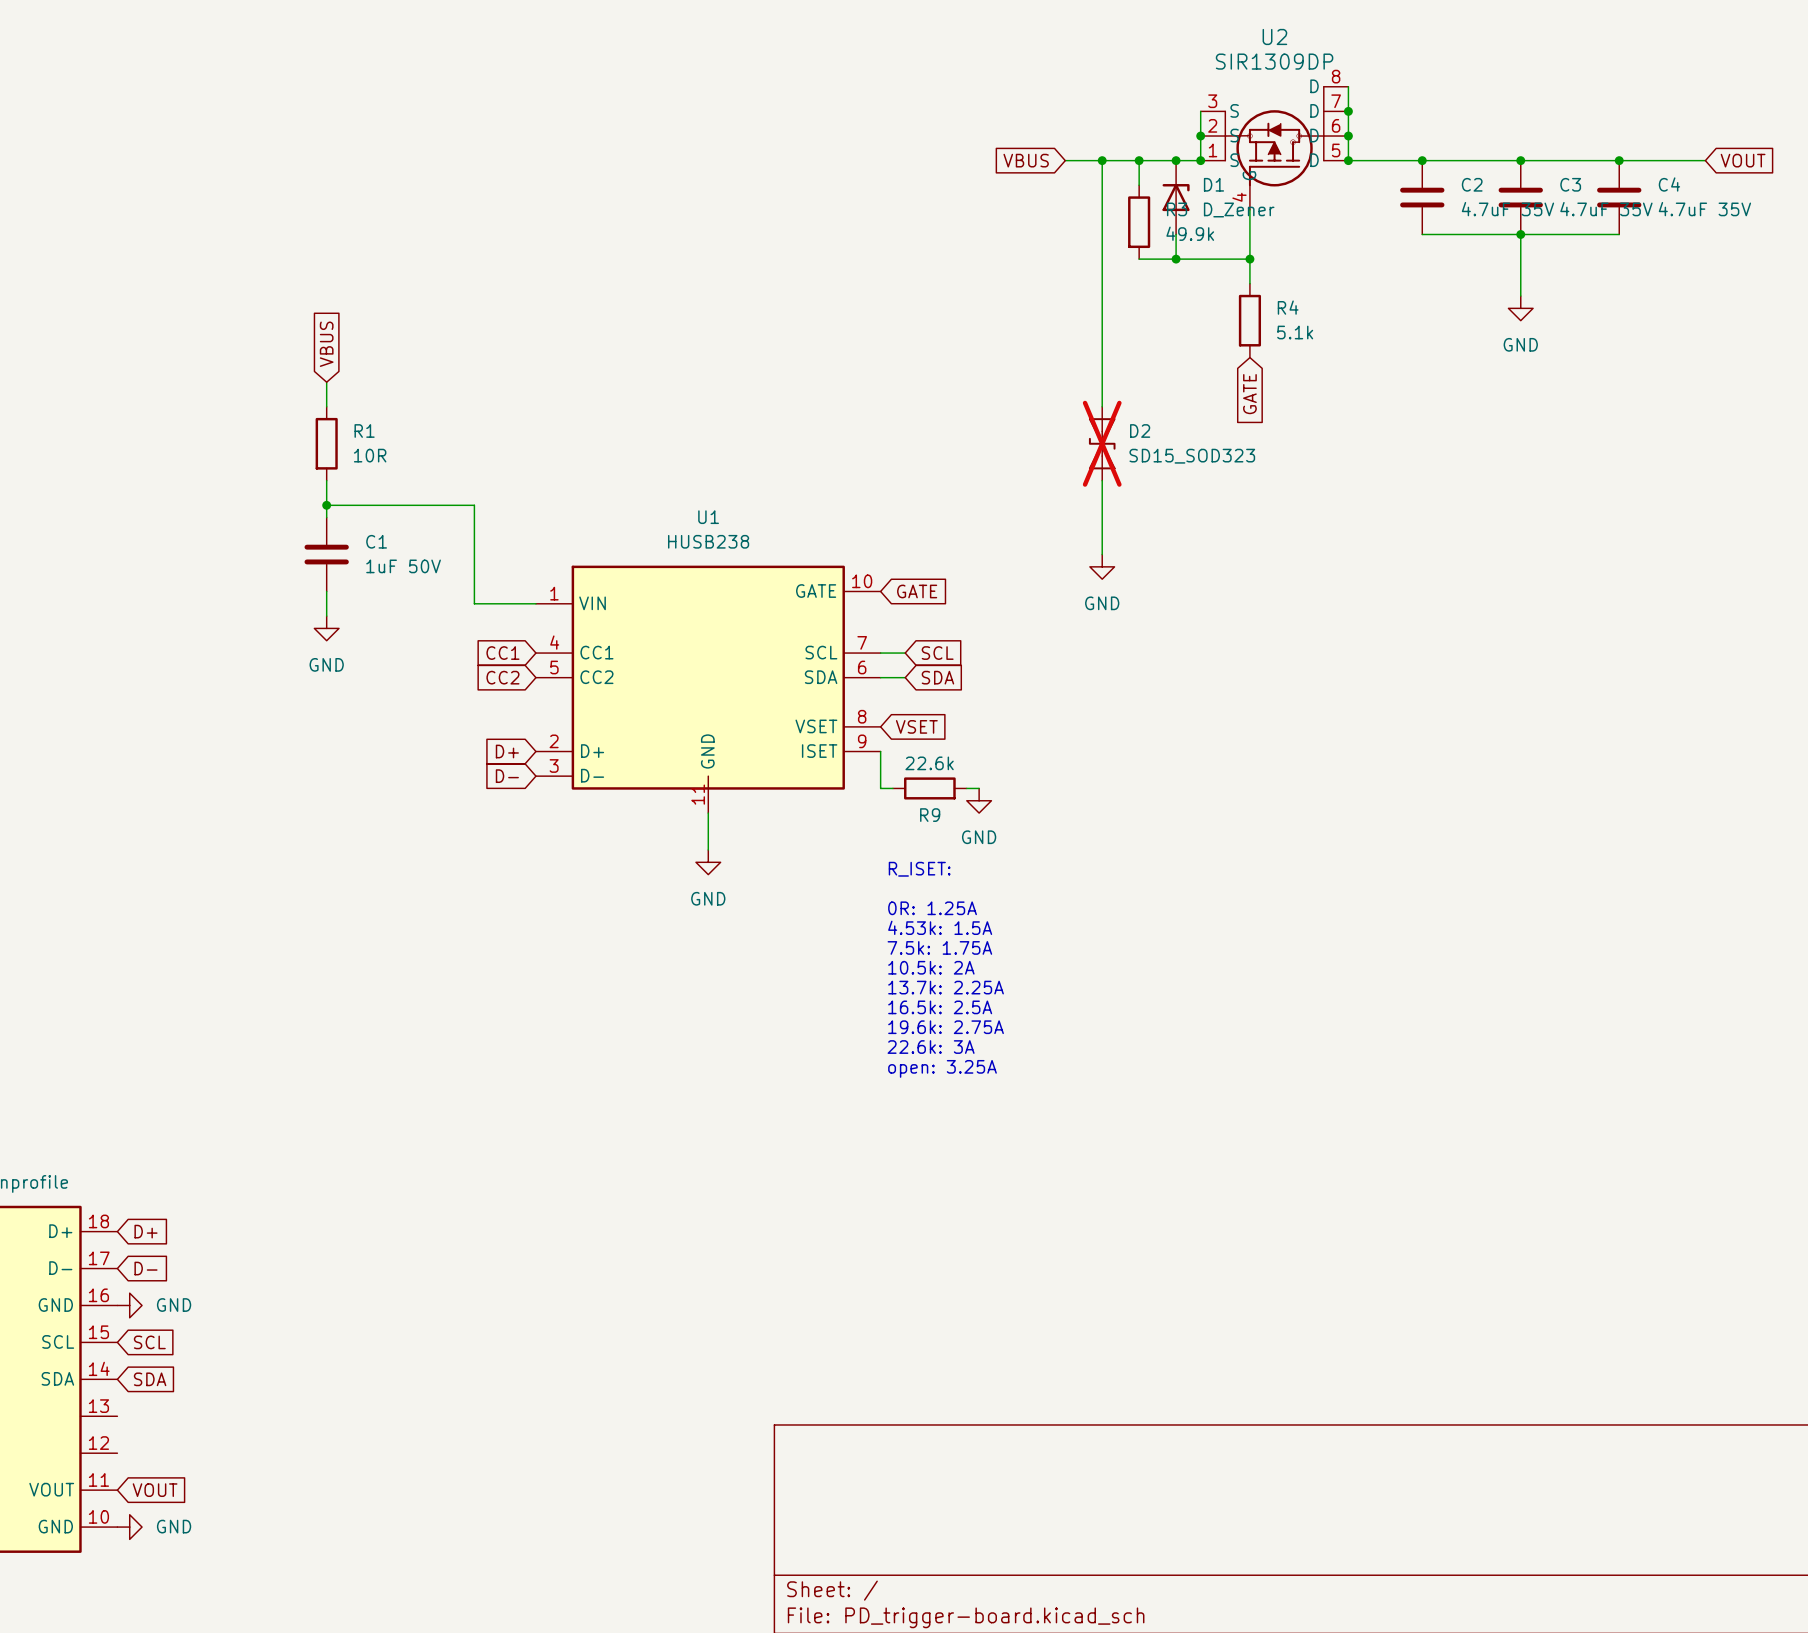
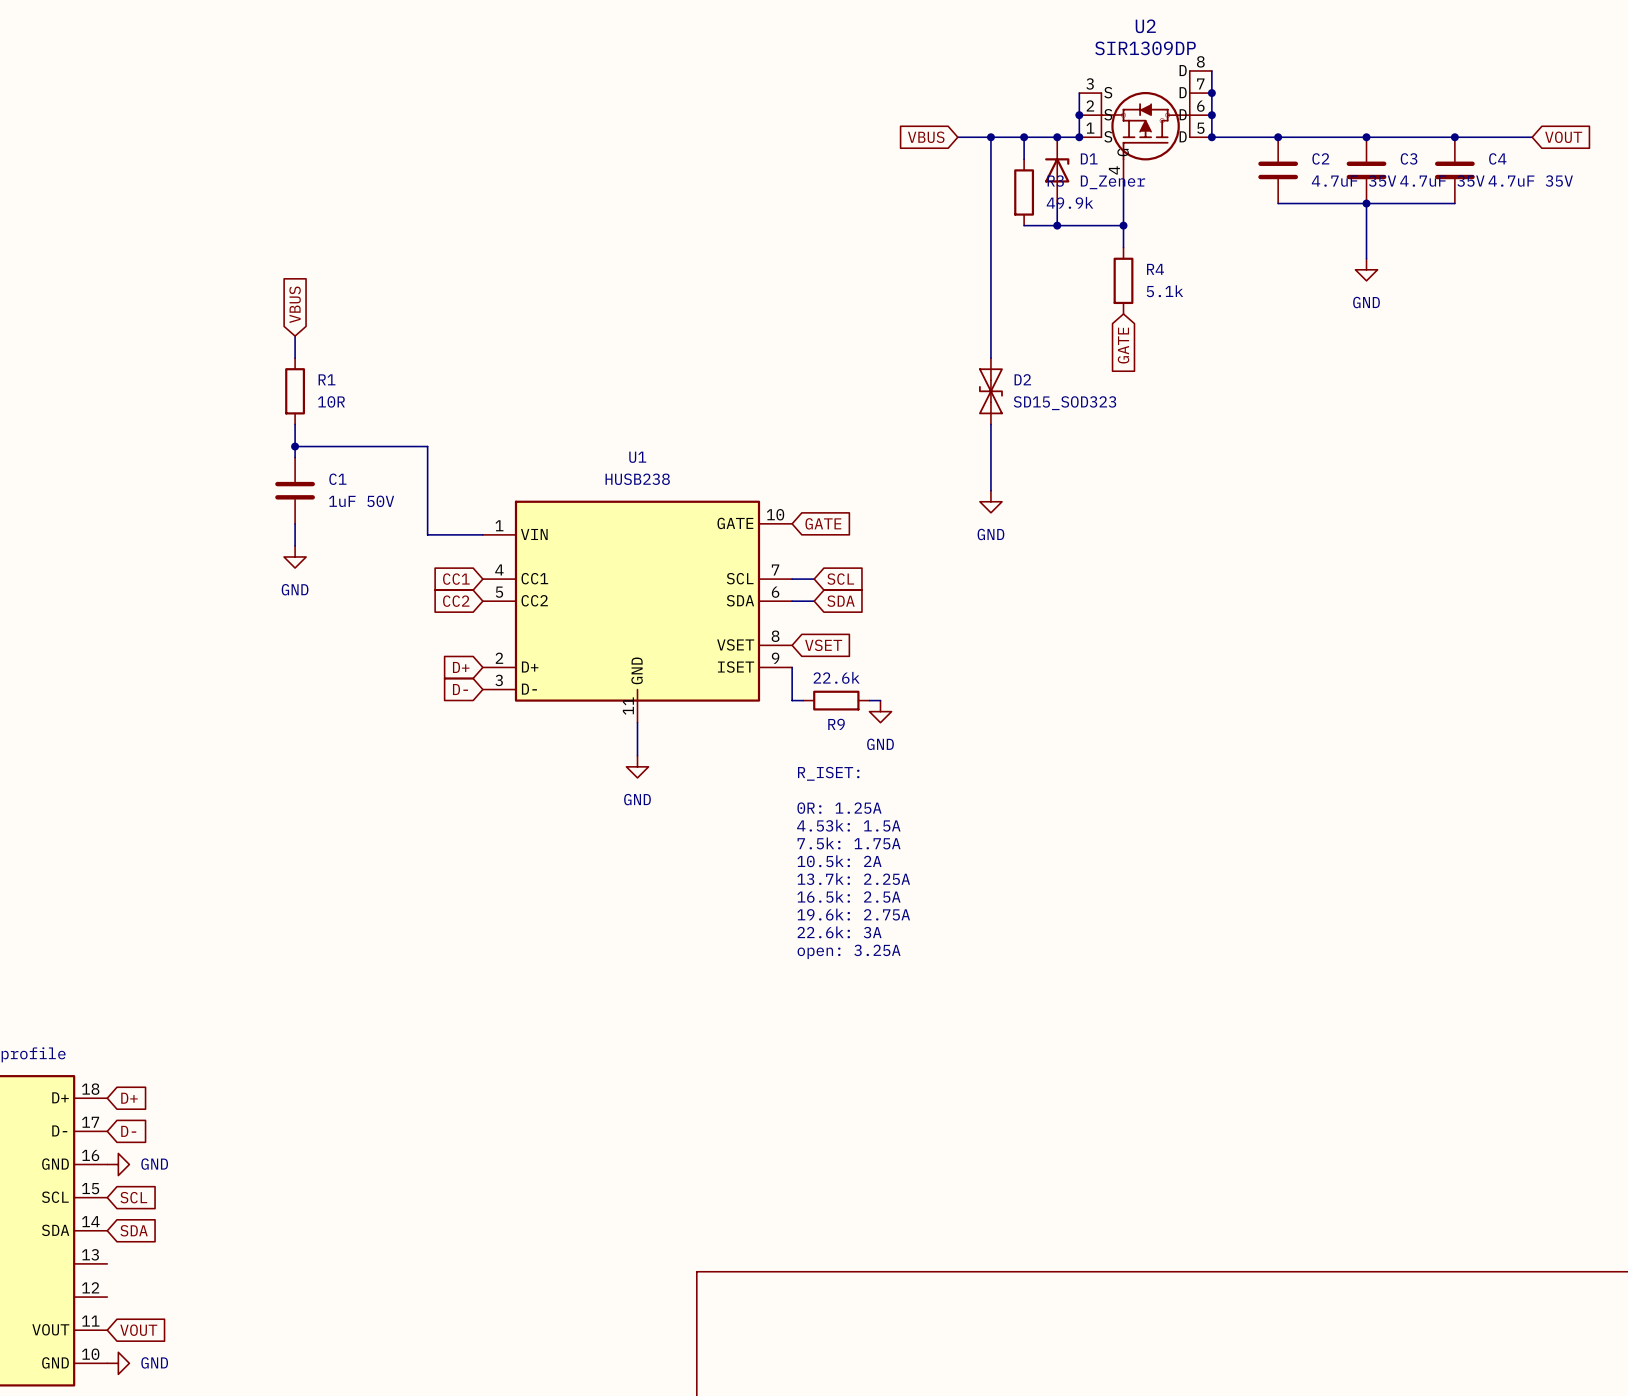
D2 do-not-place cross: (1102, 443) -> none

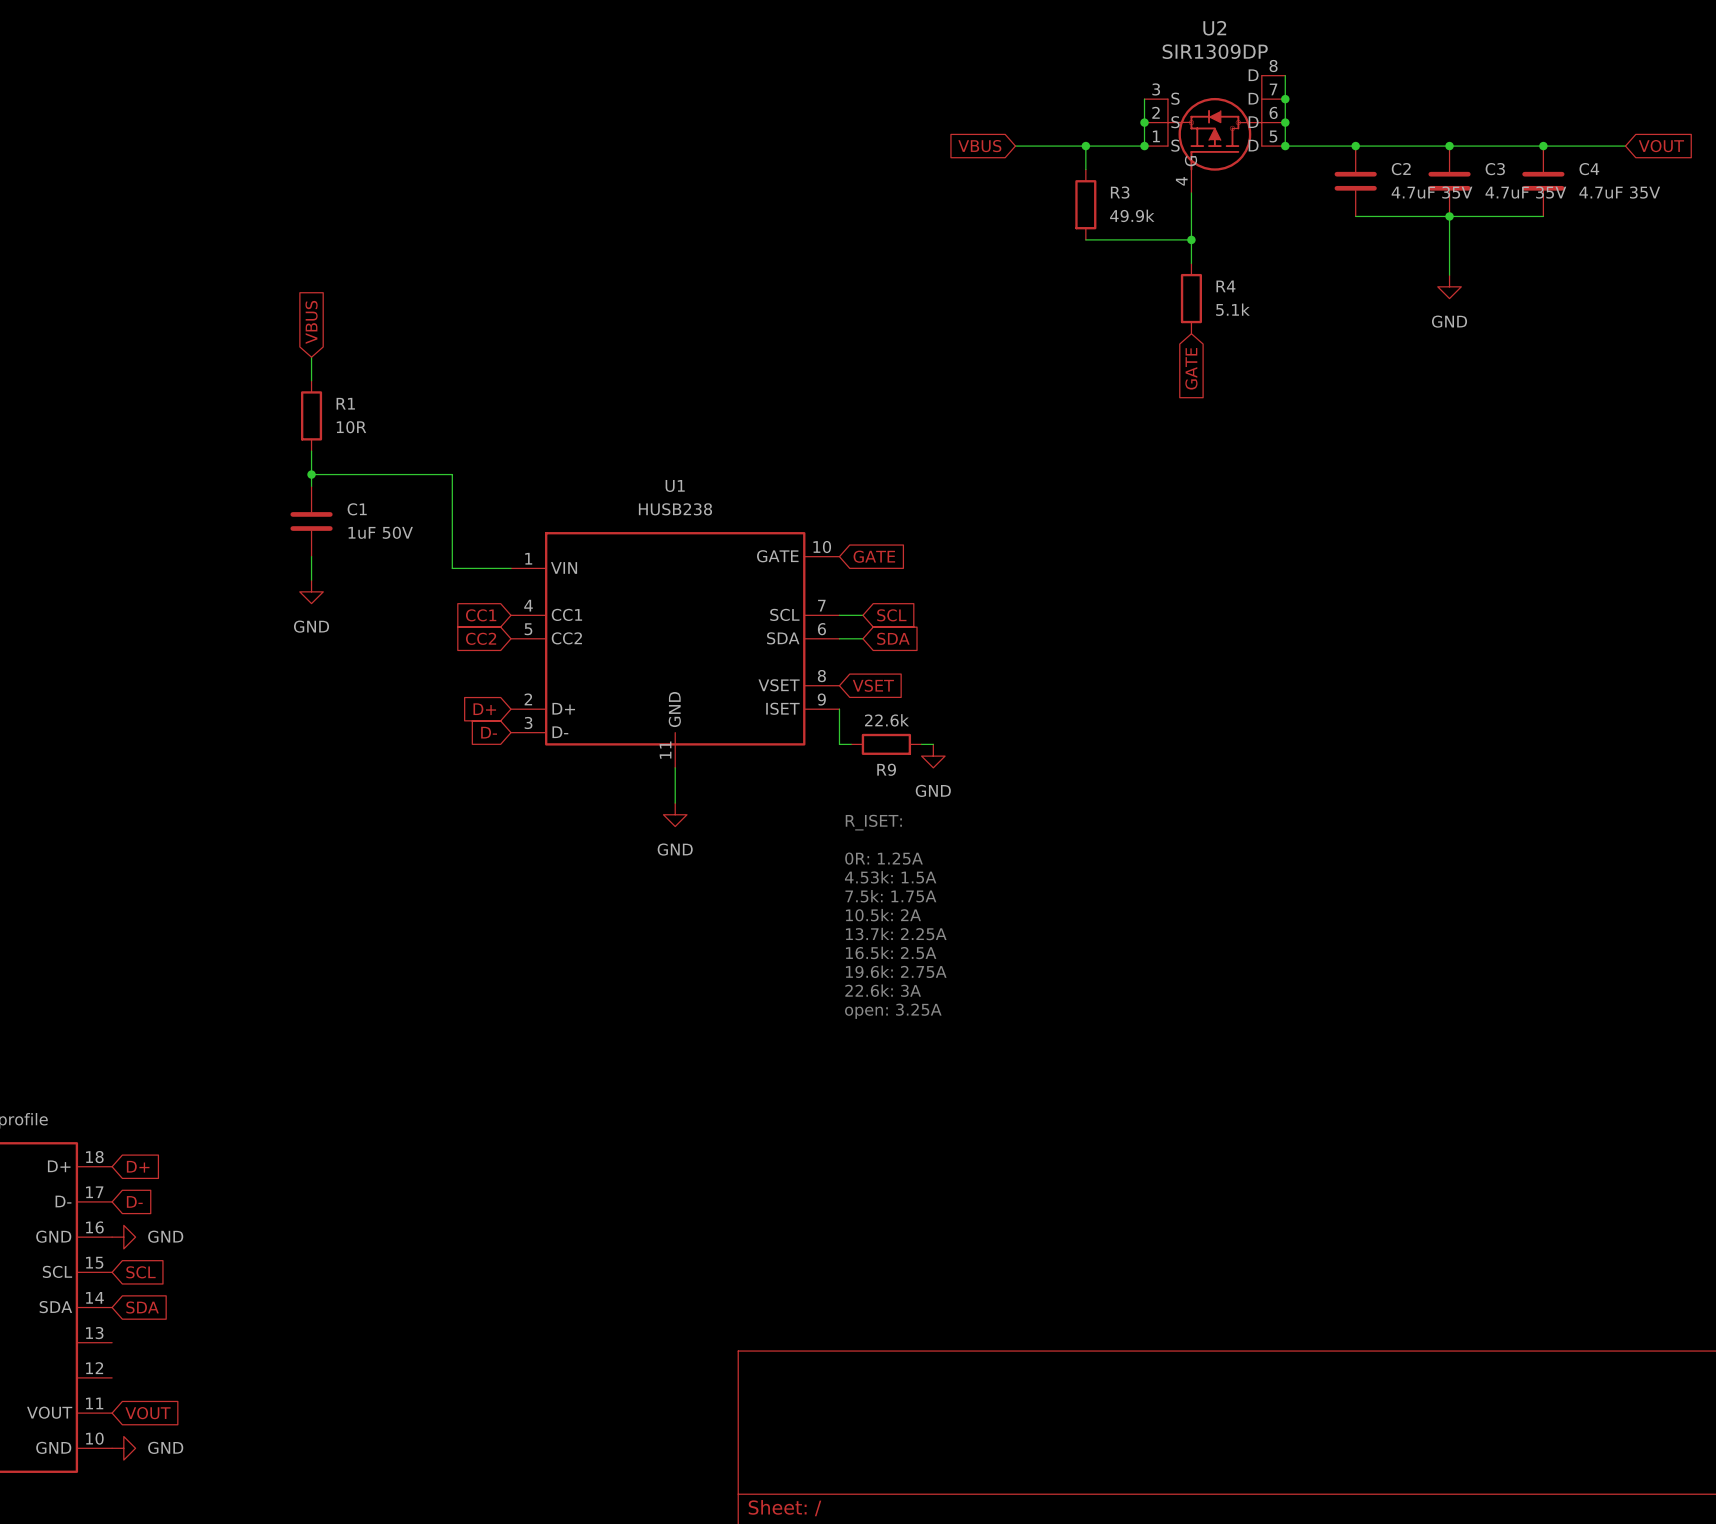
wire: (990, 137) (990, 358) -> none
junction: (990, 137) -> none
junction: (1057, 137) -> none
D1: D_Zener (1057, 170) -> none
wire: (1057, 203) (1057, 225) -> none
junction: (1057, 225) -> none
D2: SD15_SOD323 (990, 391) -> none
wire: (990, 424) (990, 490) -> none
power symbol: GND (990, 501) -> none

